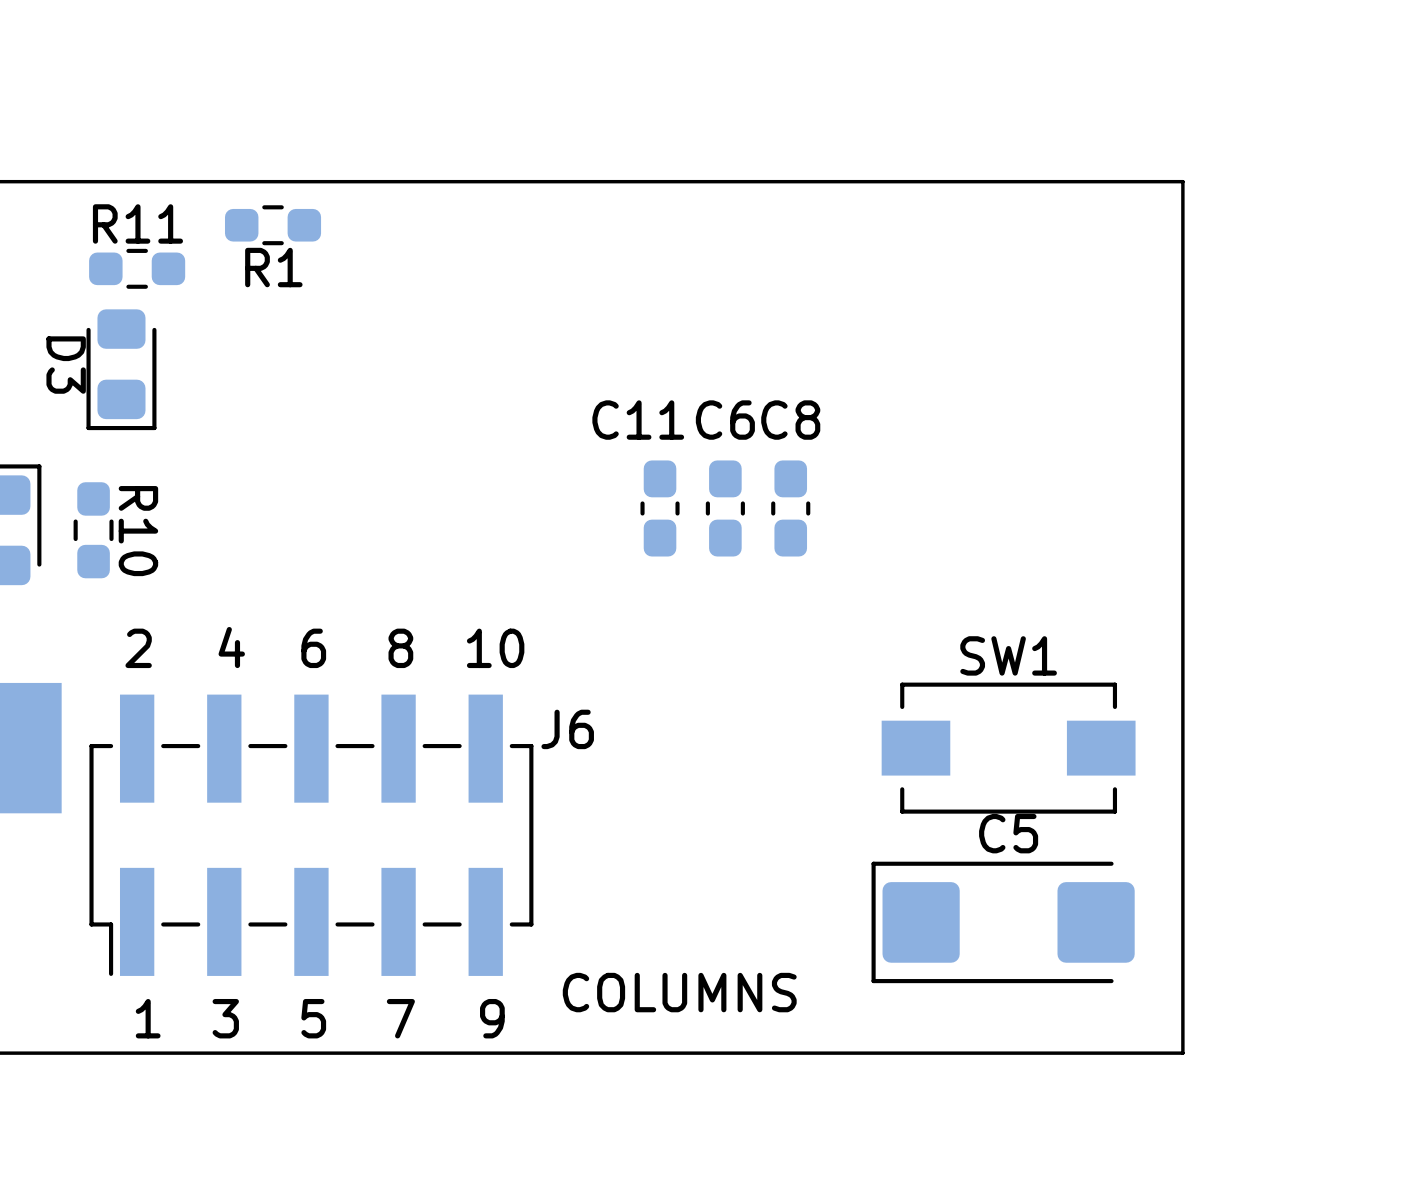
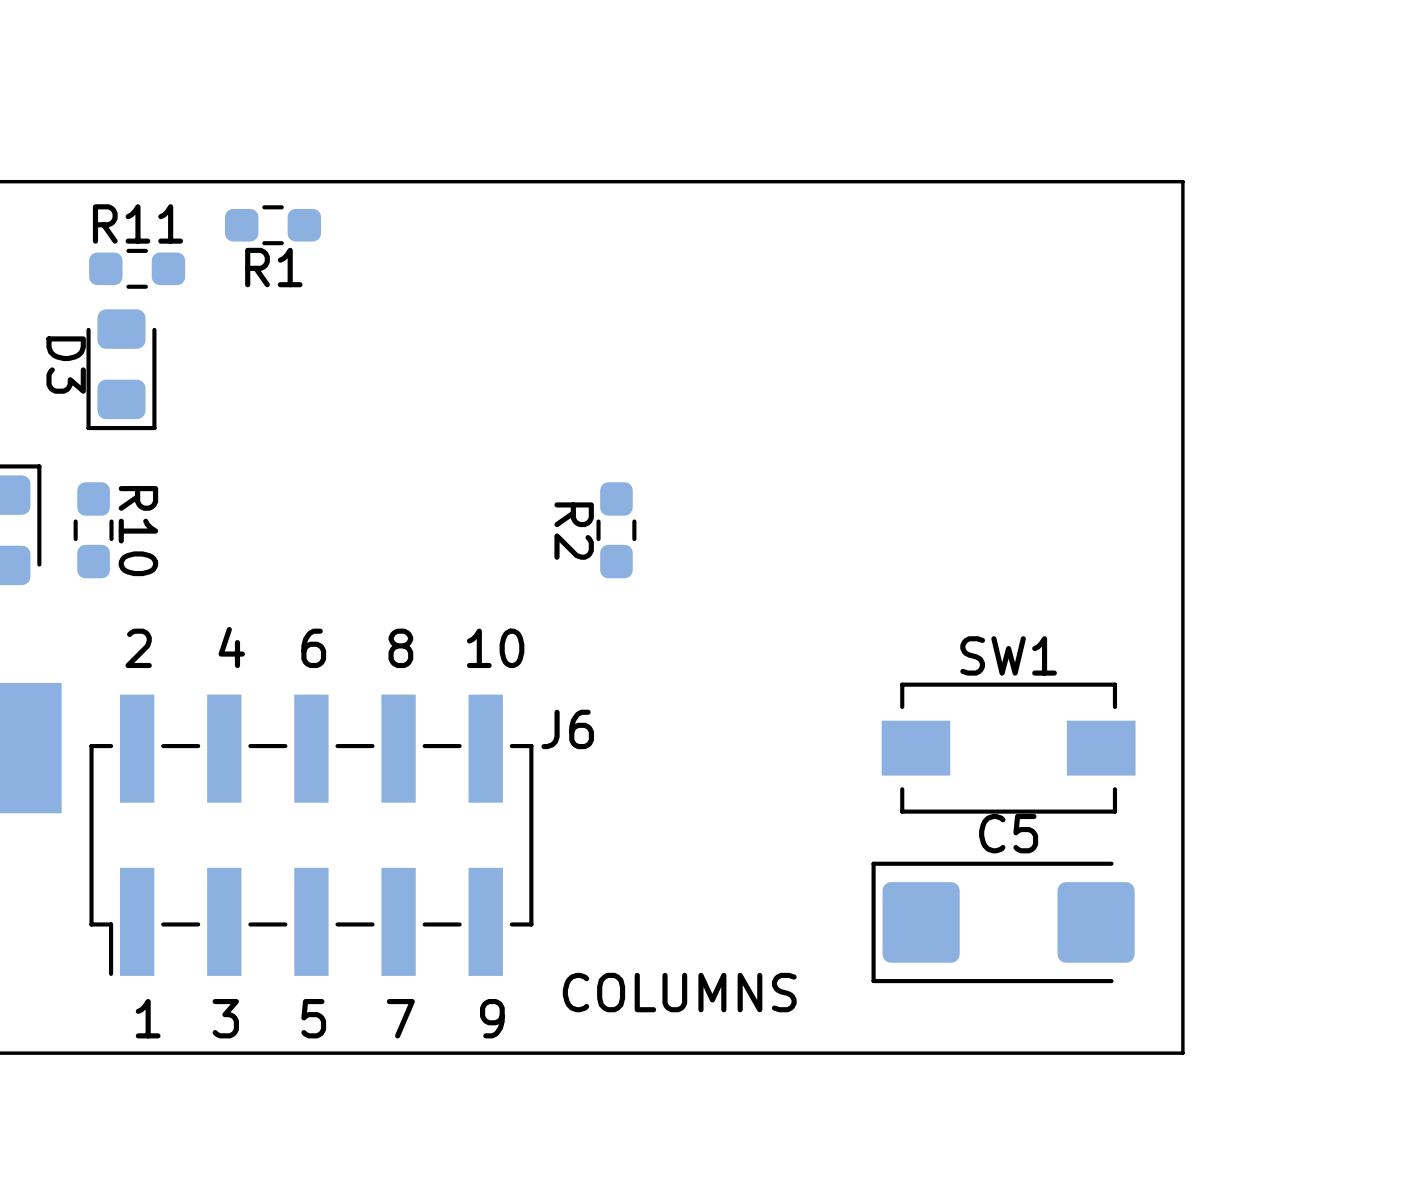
C11: (660, 508) -> none
C6: (725, 508) -> none
C8: (790, 508) -> none
R2: none -> (616, 530)

